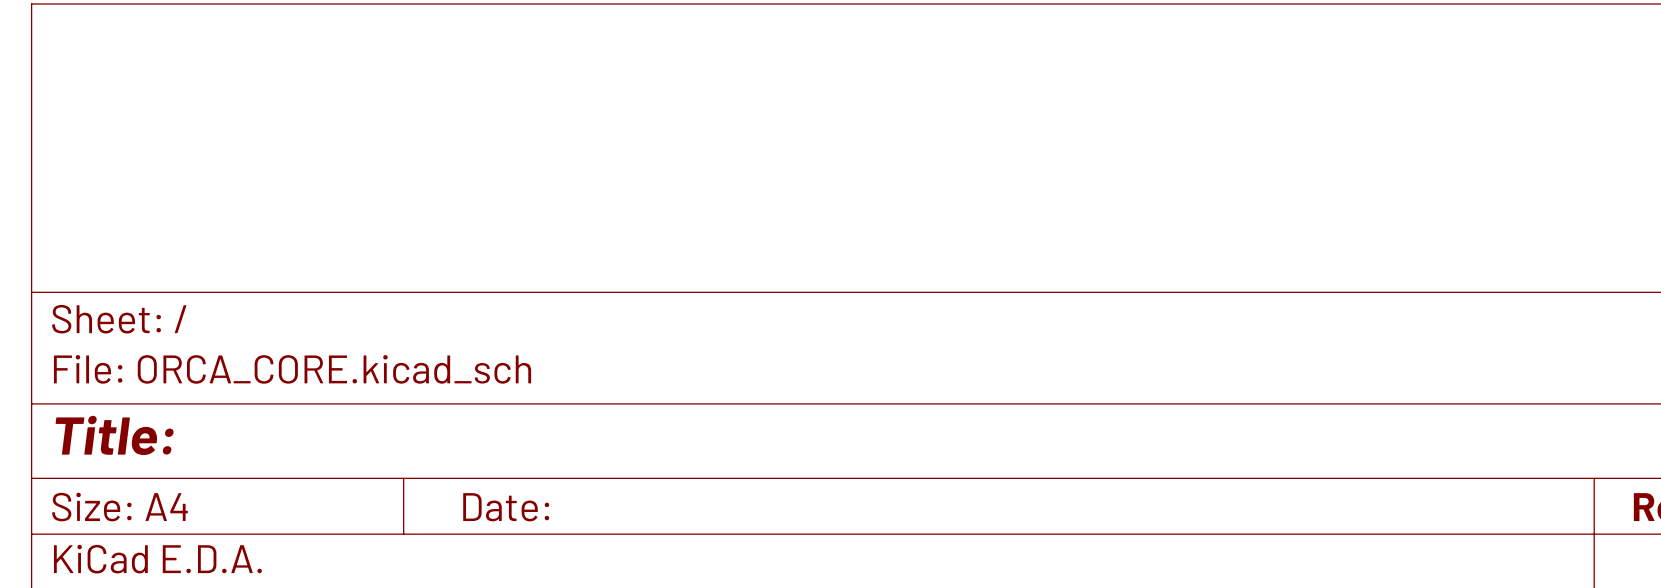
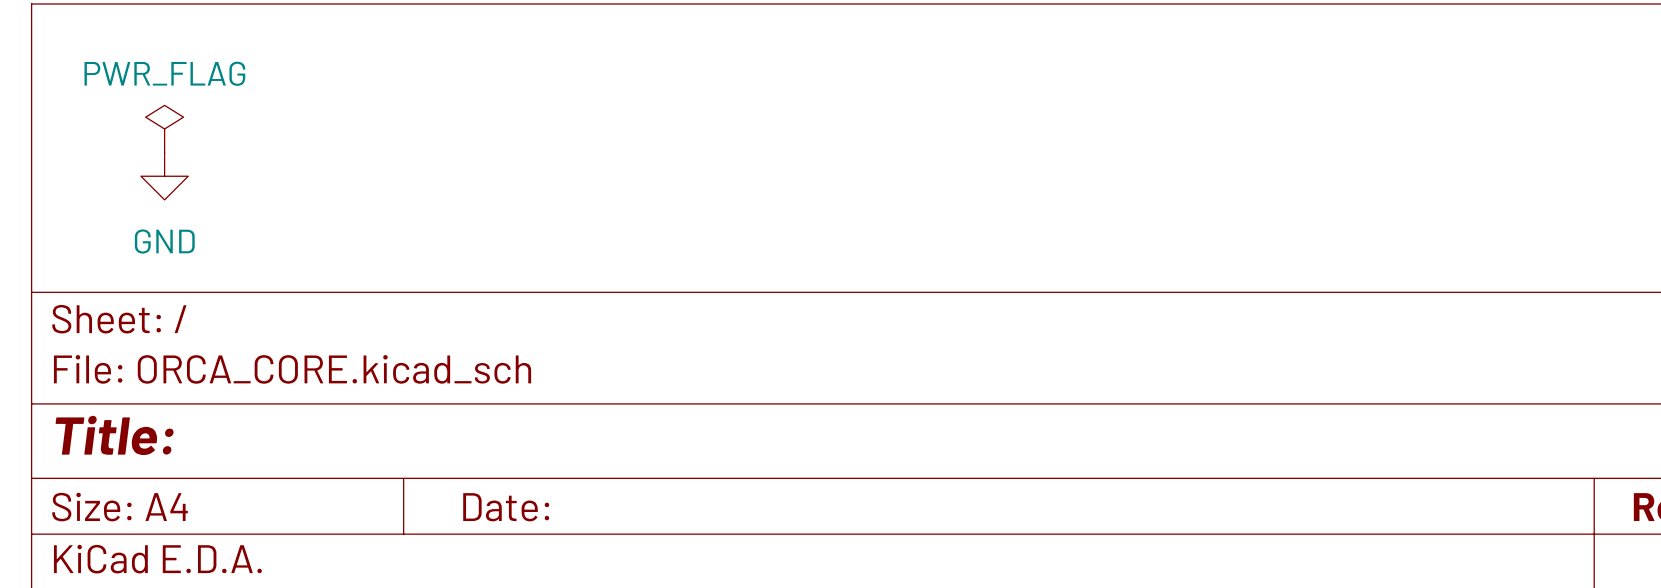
power symbol: none -> PWR_FLAG (164, 128)
power symbol: none -> GND (164, 176)

